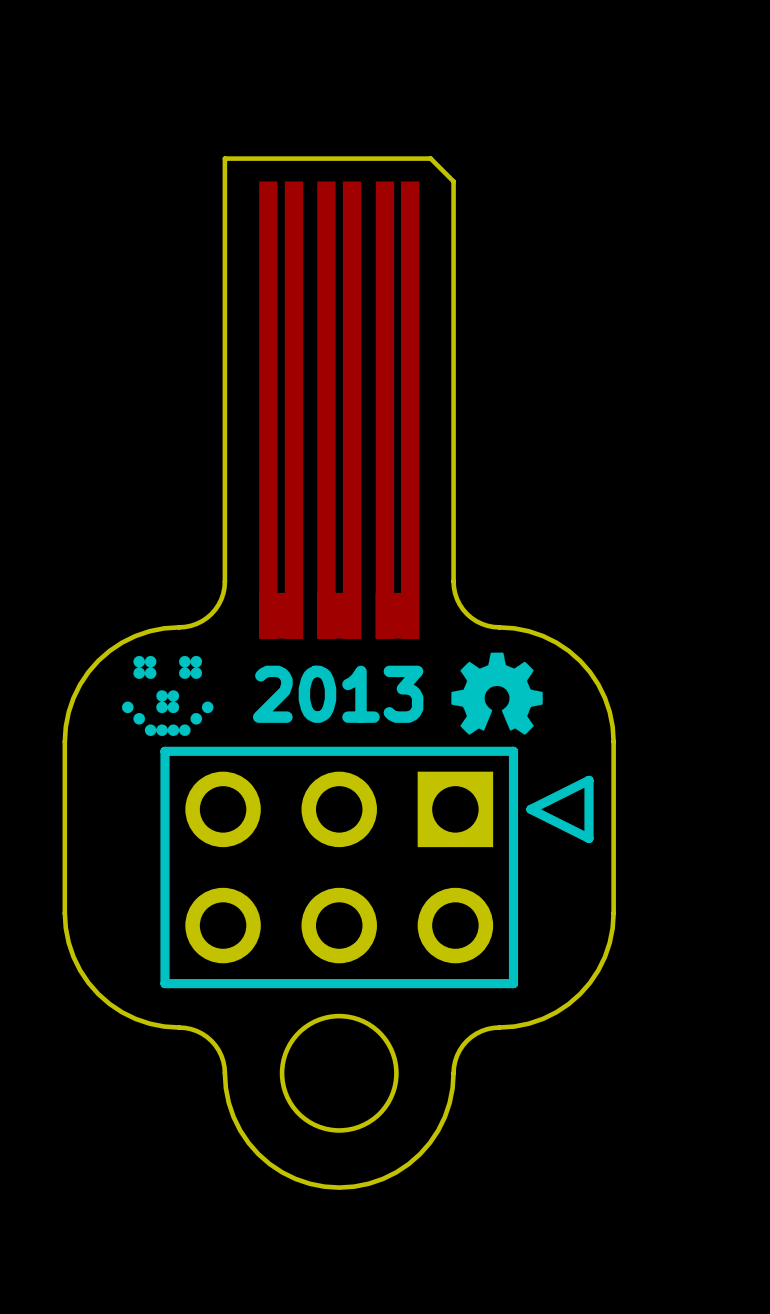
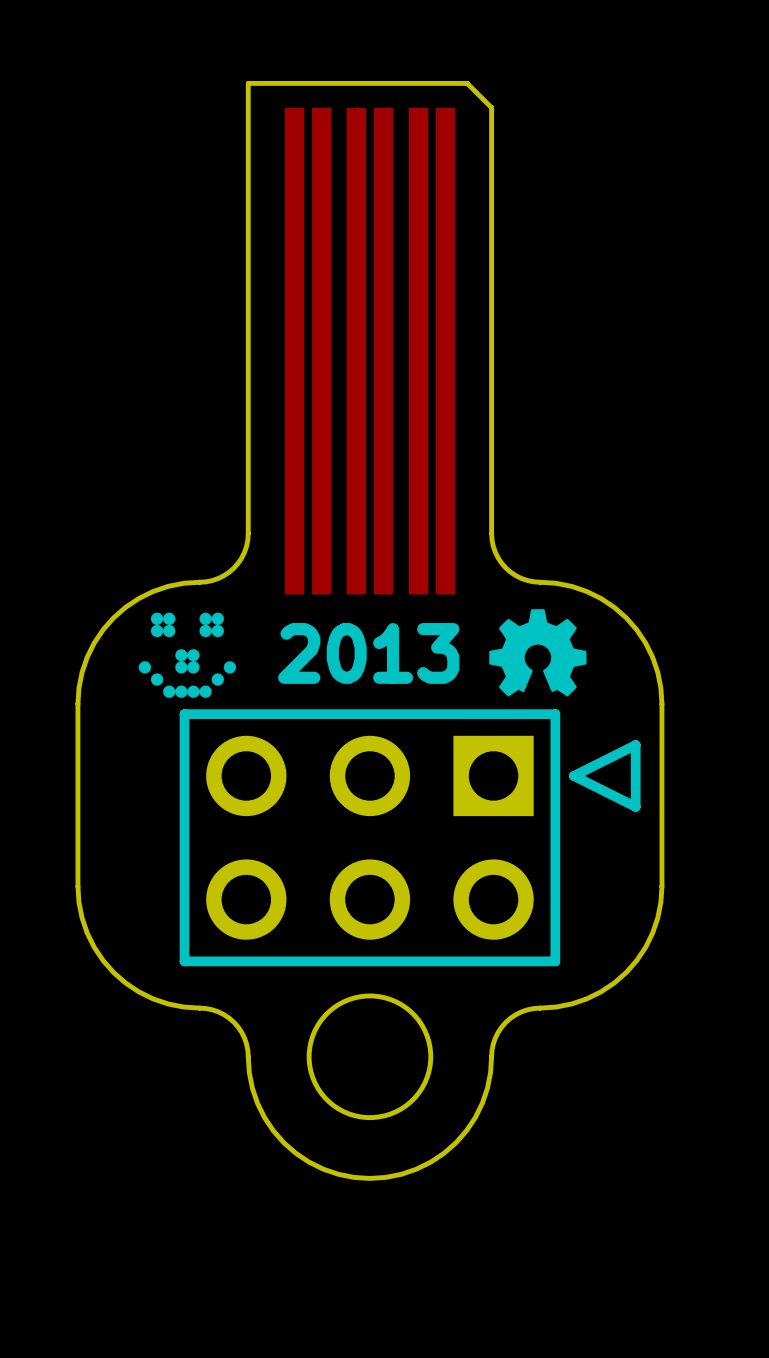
part footprint: [259, 181, 420, 639] -> [284, 107, 456, 595]

